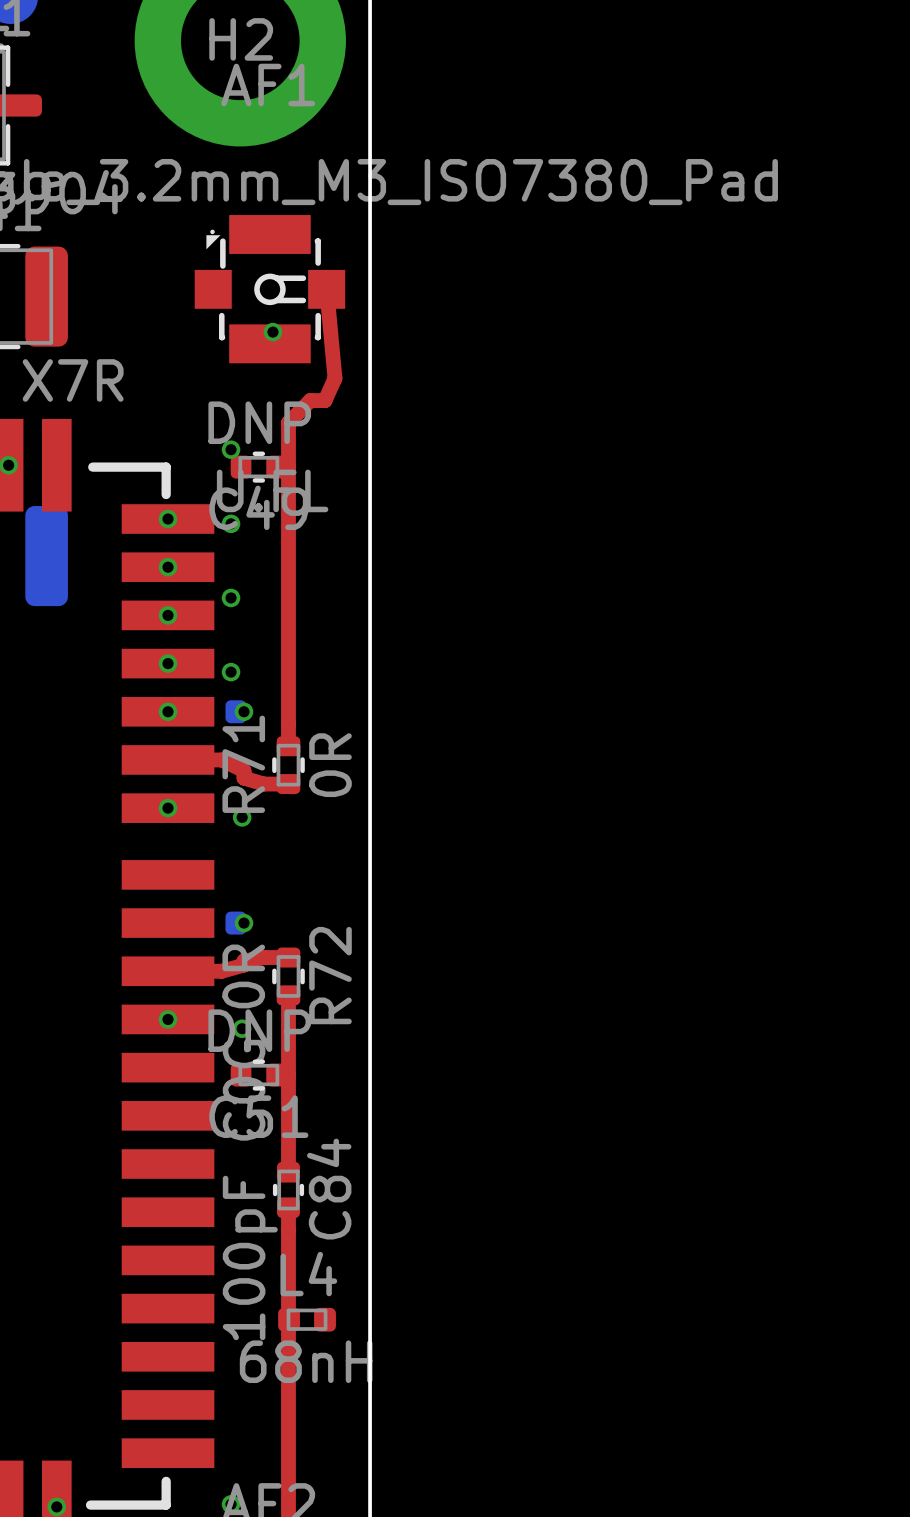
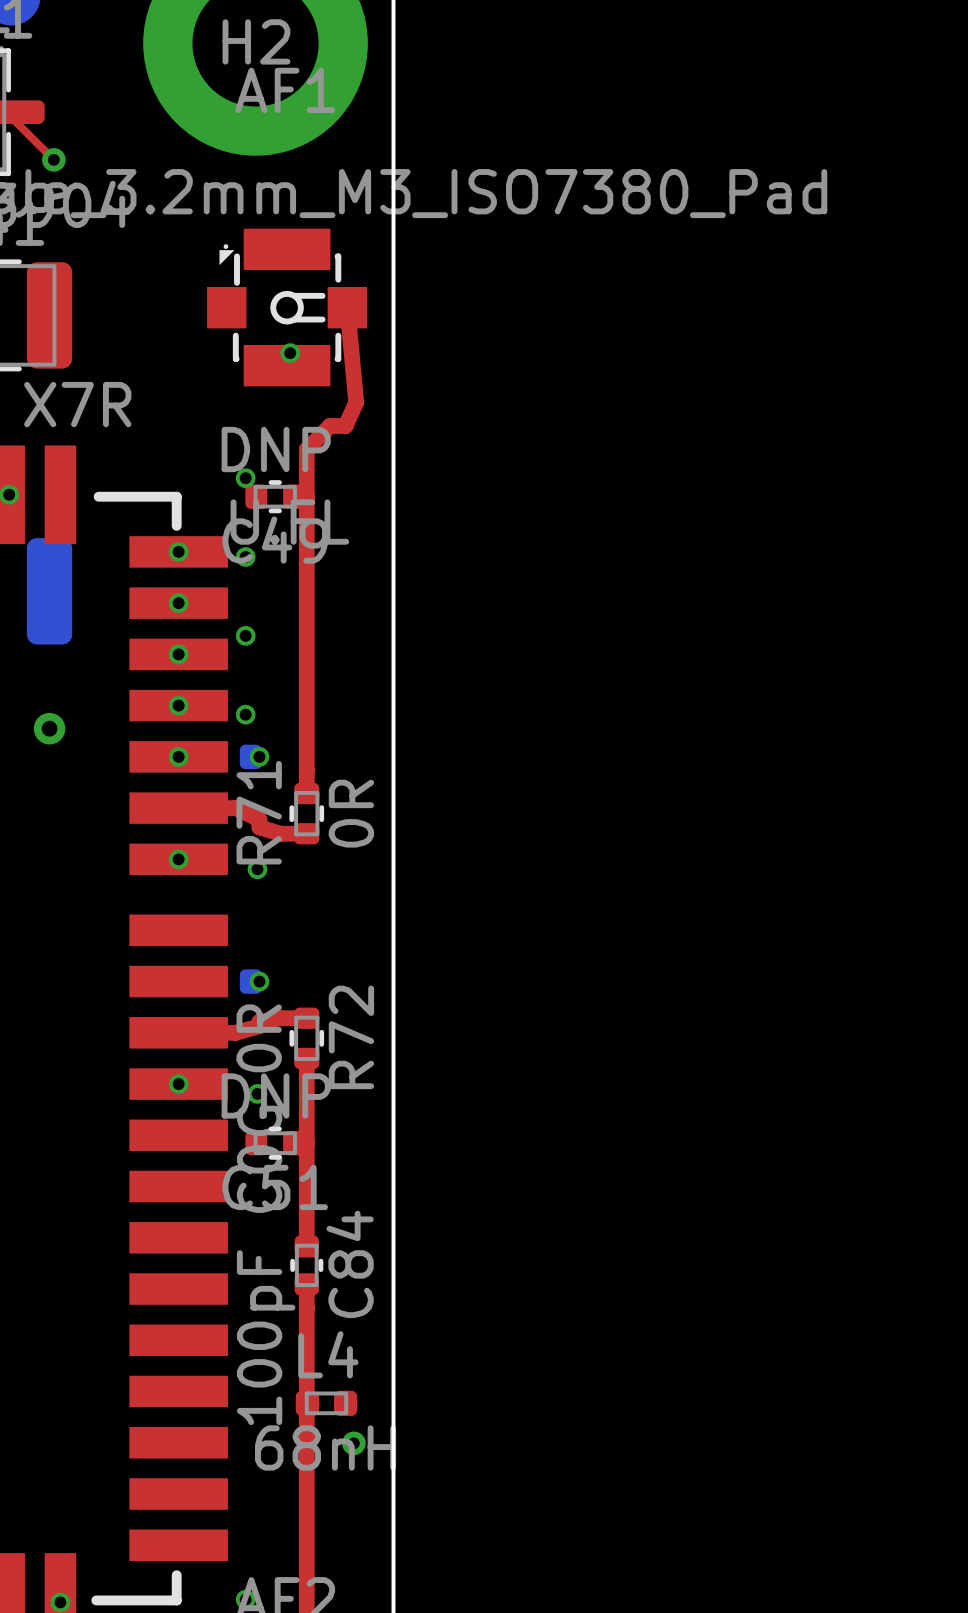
top track: none -> (15, 112) (15, 121) (53, 159)
via: none -> (53, 159)
via: none -> (49, 728)
via: none -> (353, 1443)

